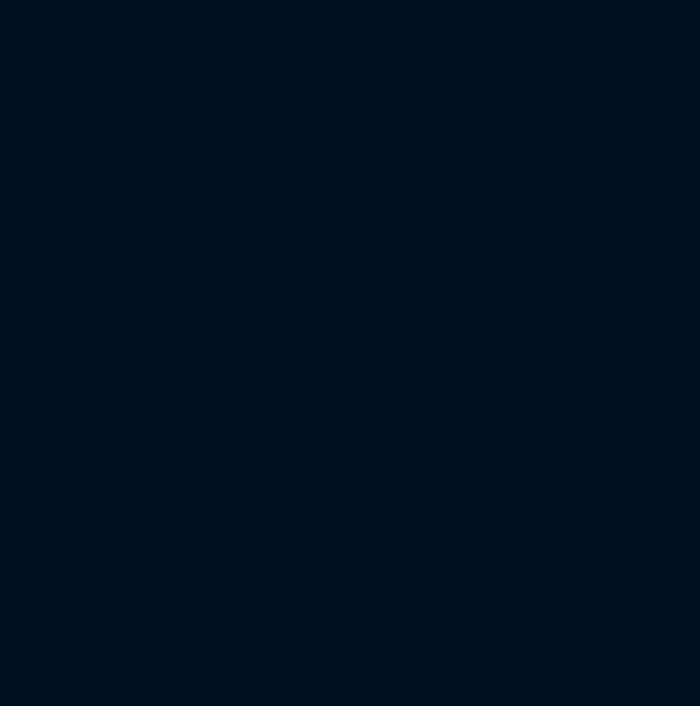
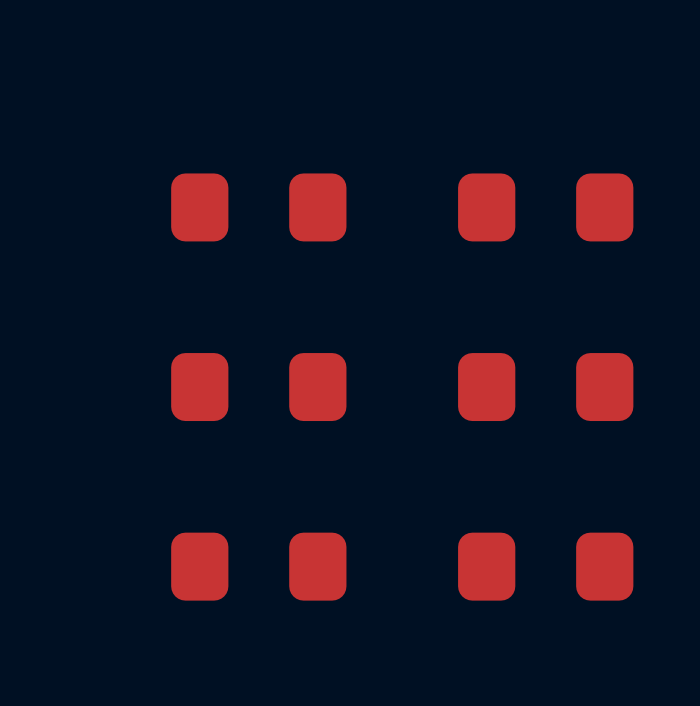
part: none -> (258, 207)
part: none -> (545, 207)
part: none -> (258, 387)
part: none -> (545, 387)
part: none -> (258, 566)
part: none -> (545, 566)

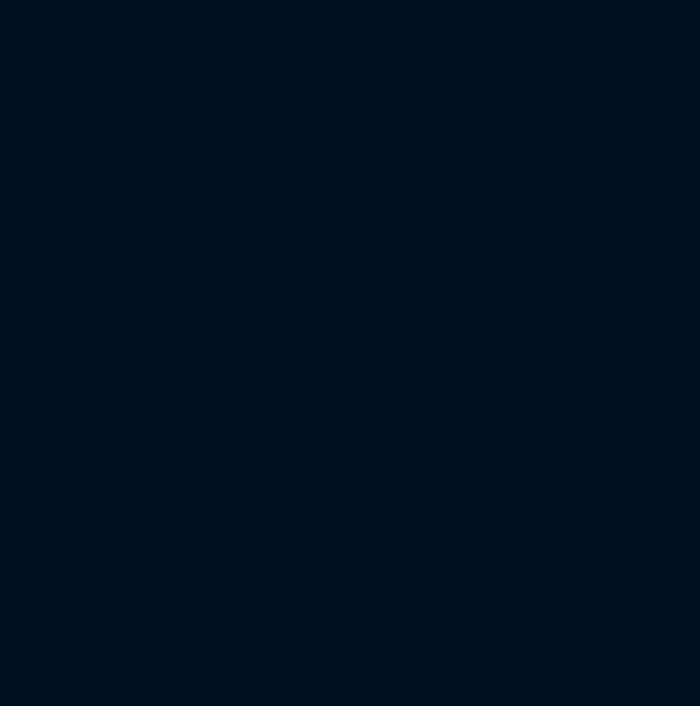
part: (258, 207) -> none
part: (545, 207) -> none
part: (258, 387) -> none
part: (545, 387) -> none
part: (258, 566) -> none
part: (545, 566) -> none

